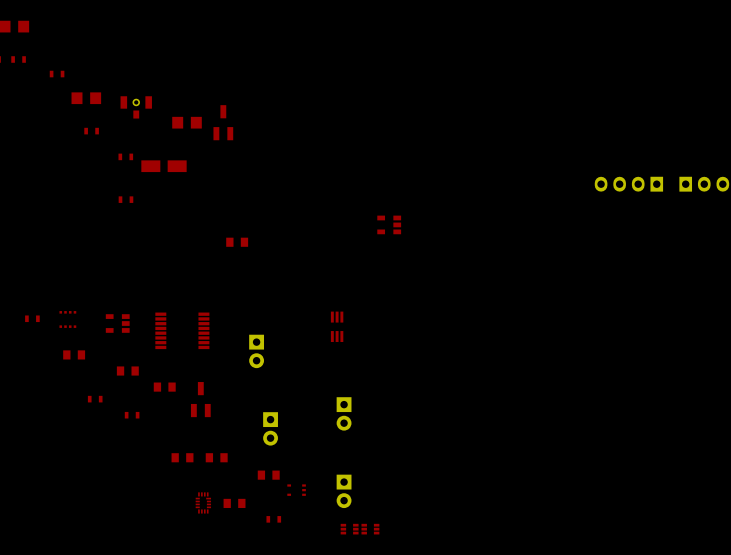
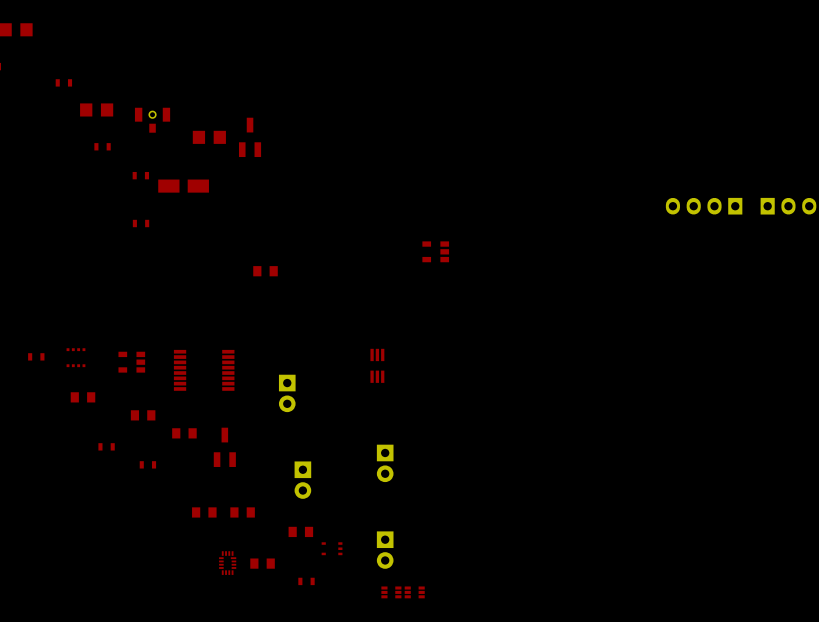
part: (18, 59) -> none

